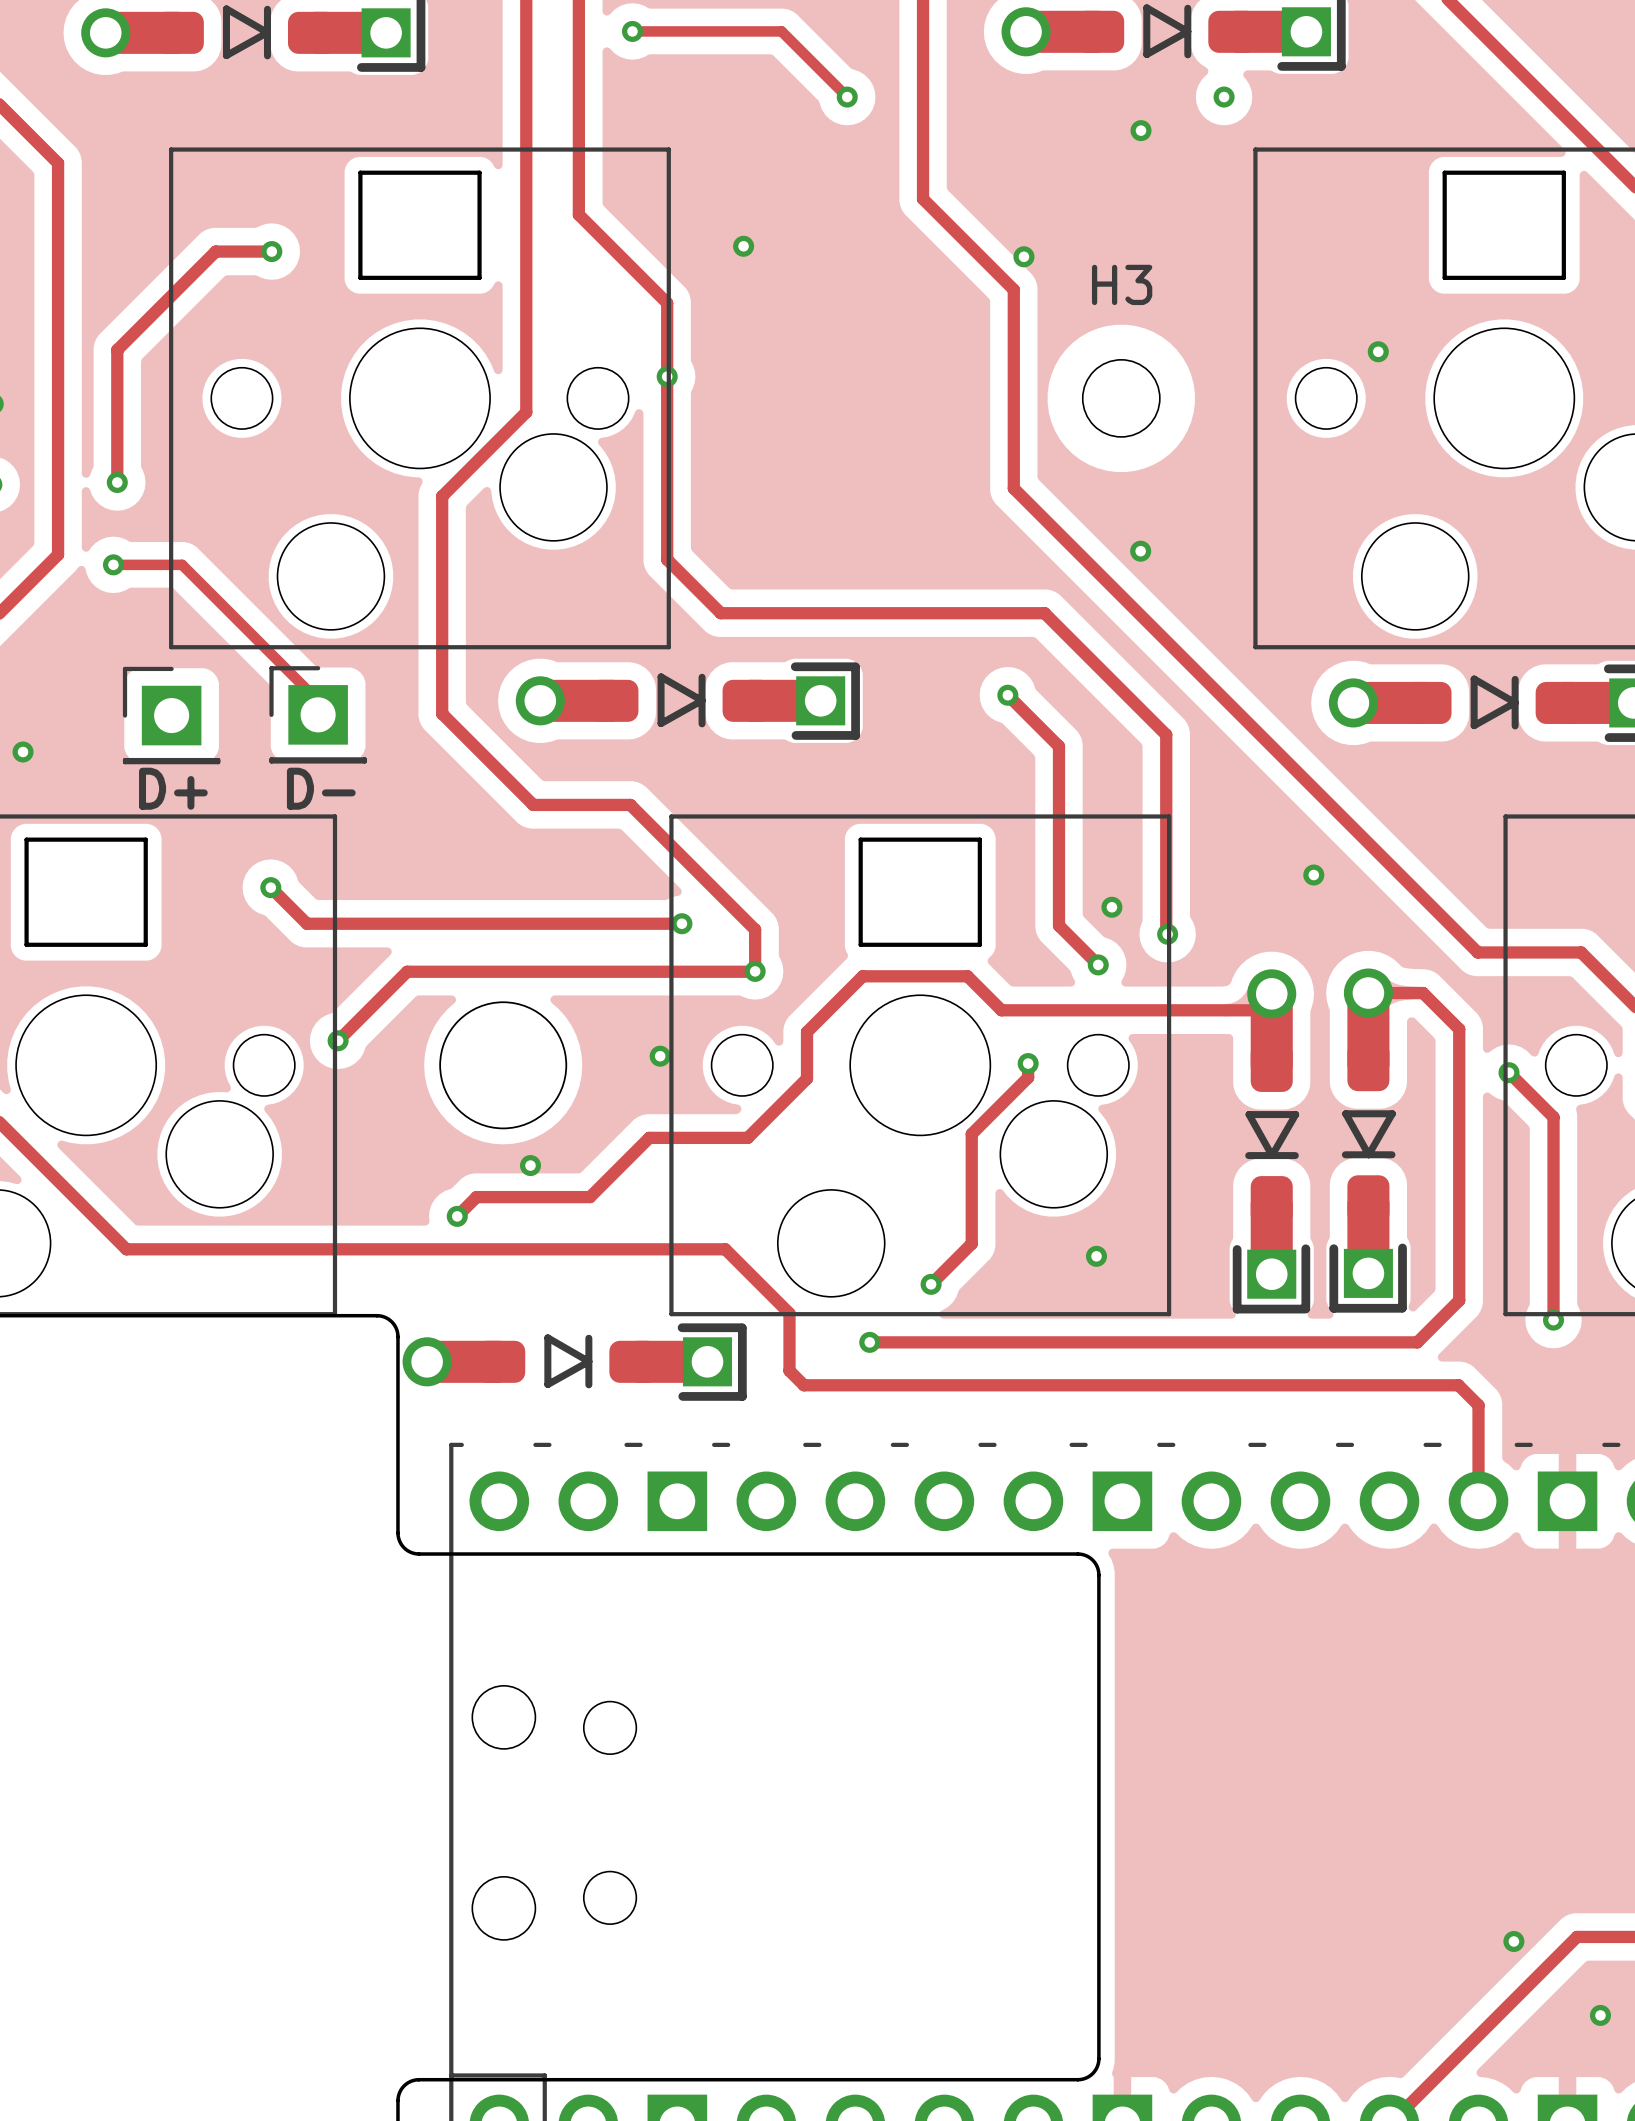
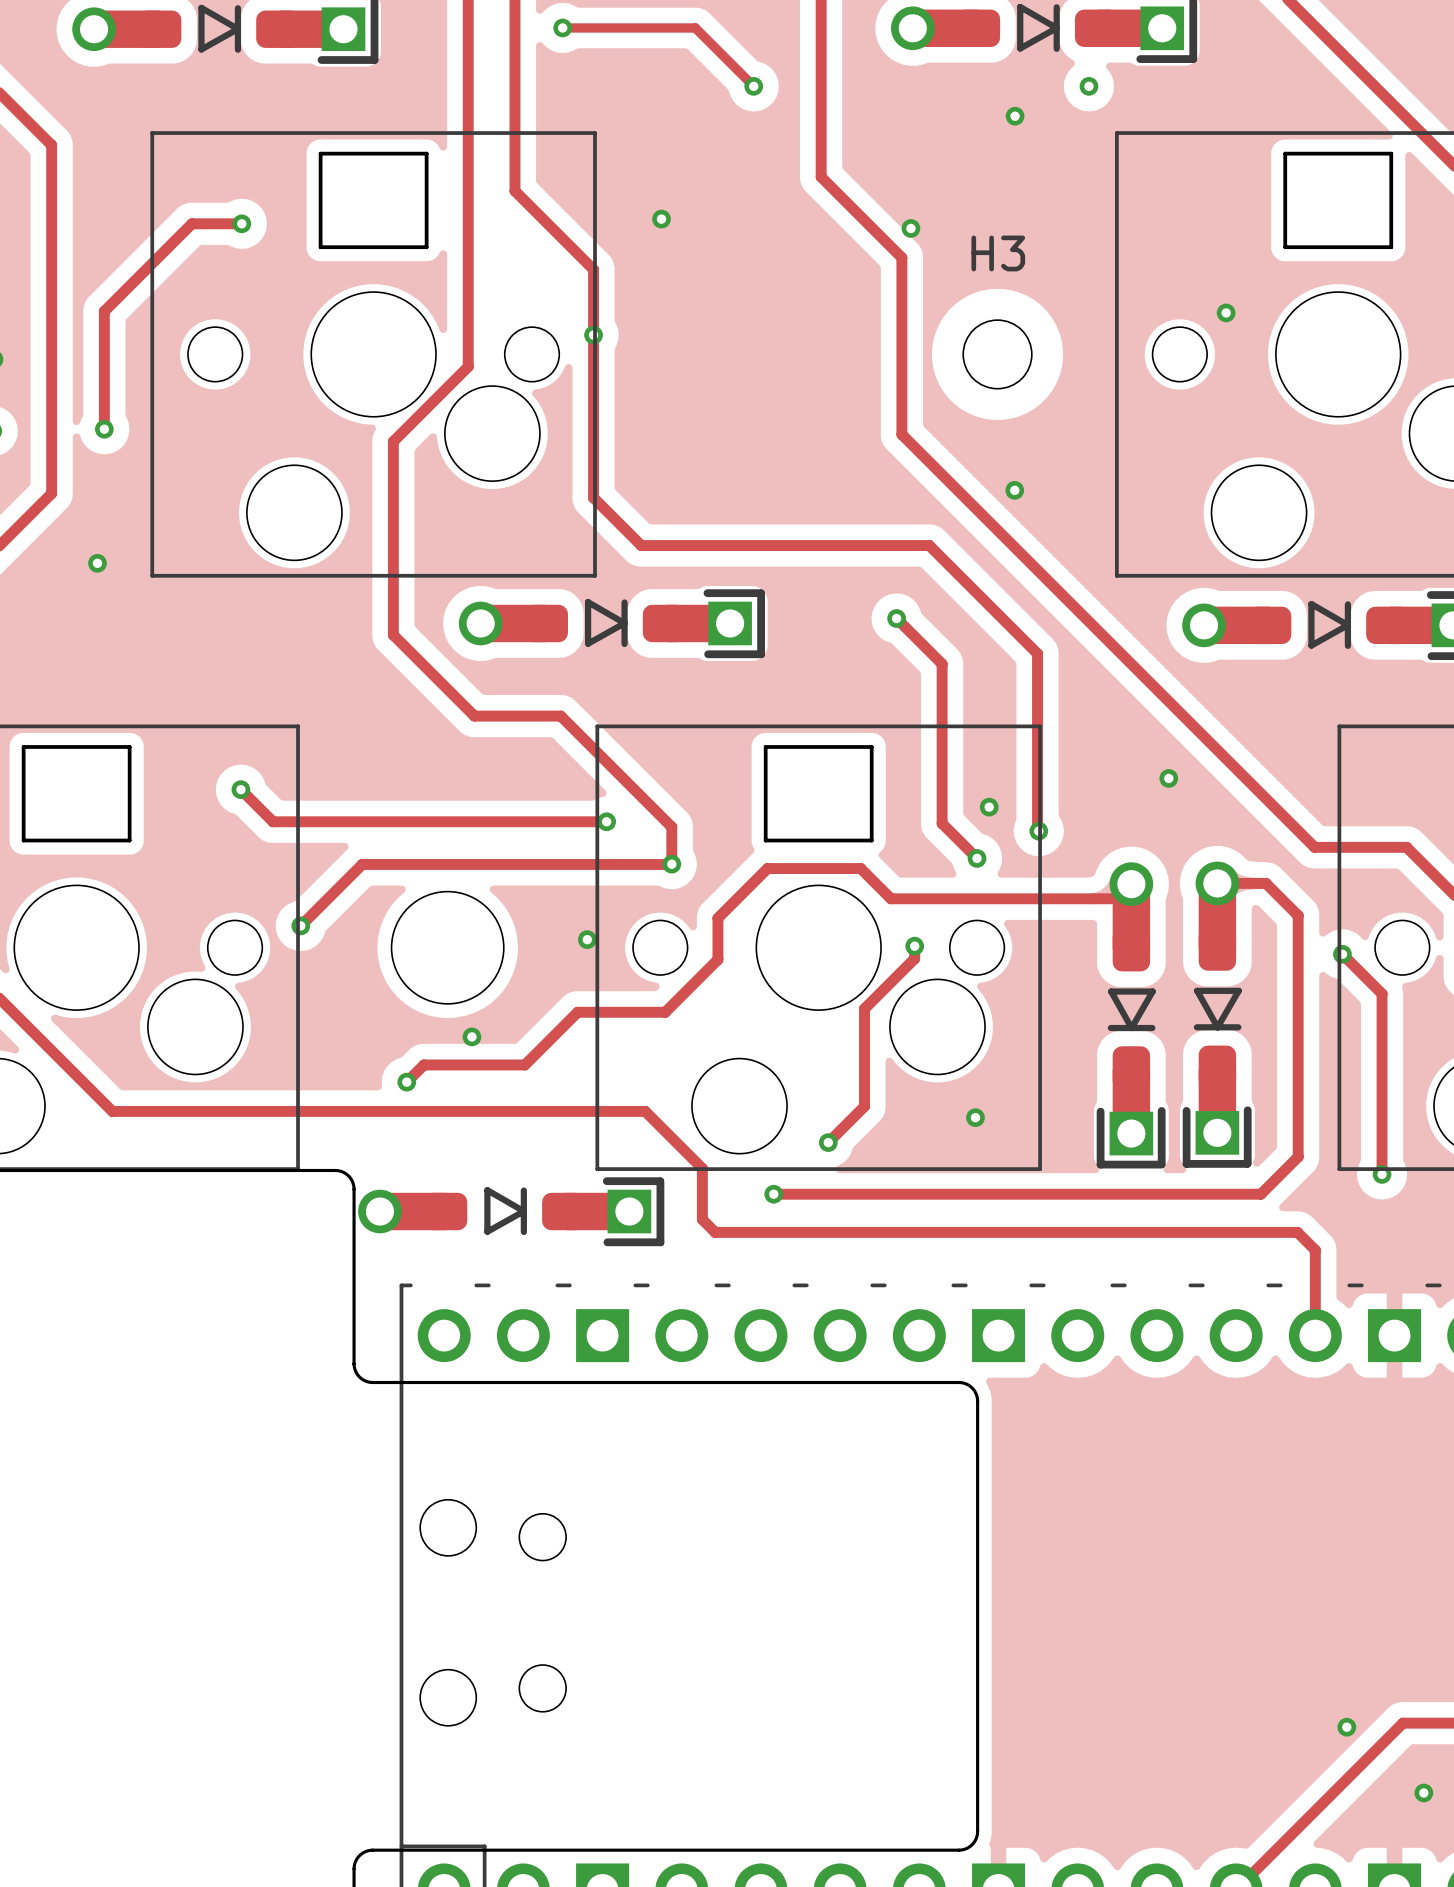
track: (113, 564) (182, 564) (318, 700) (318, 714) -> none
via position: (113, 564) -> (97, 563)
part: (318, 714) -> none
part: (171, 715) -> none
via: (23, 752) -> none
text: D+ (173, 788) -> none
text: D- (321, 788) -> none

